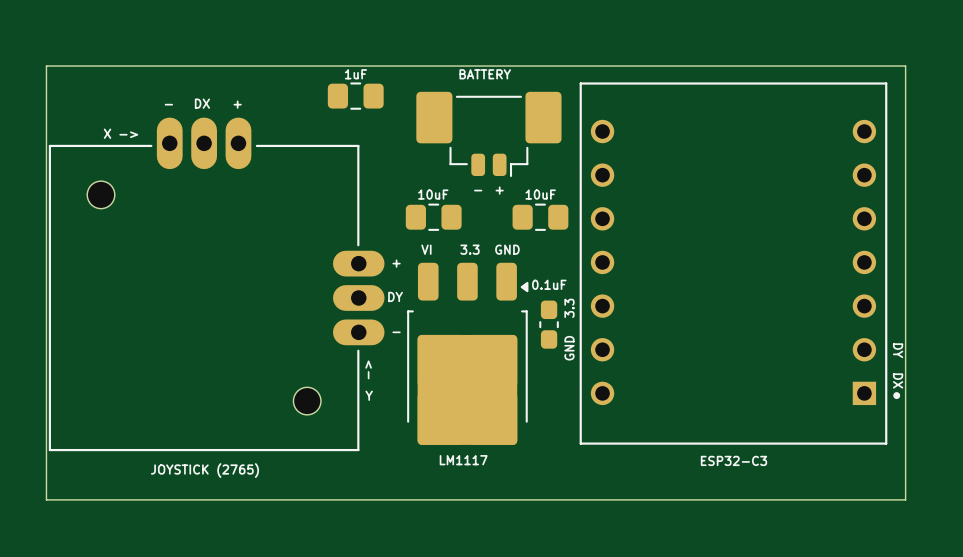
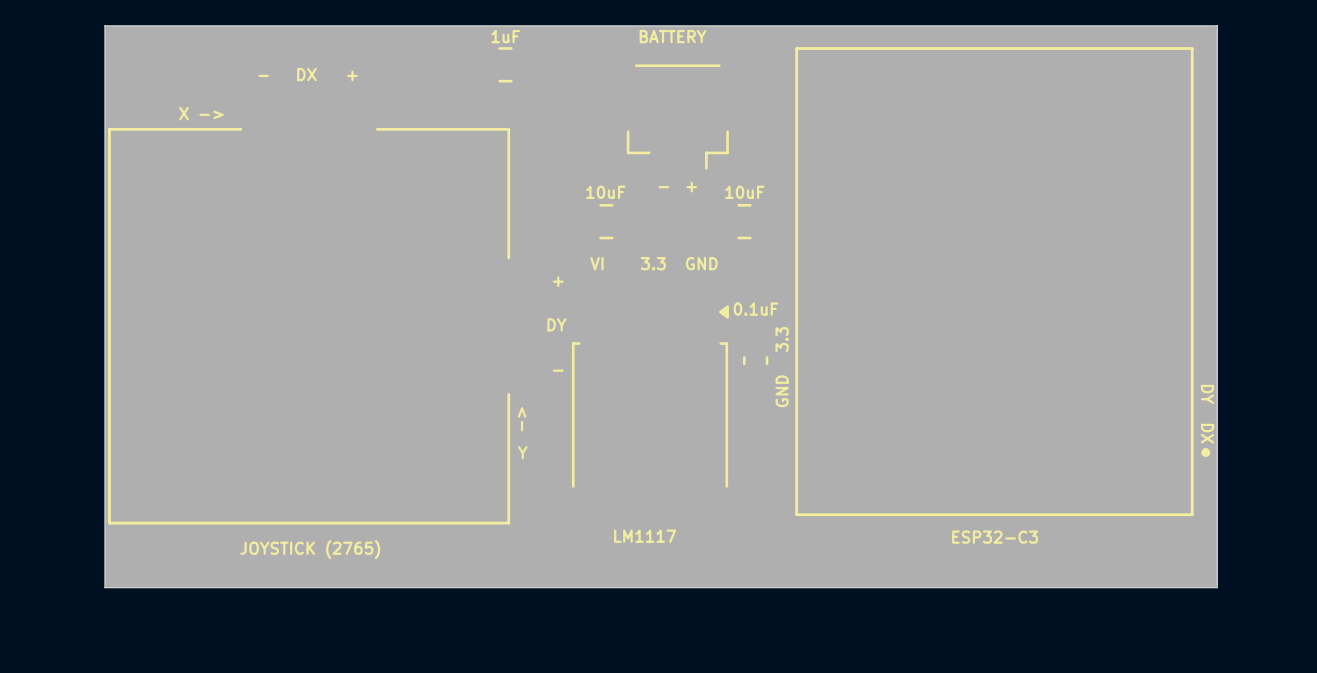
drawing: none -> [104, 25, 1218, 588]

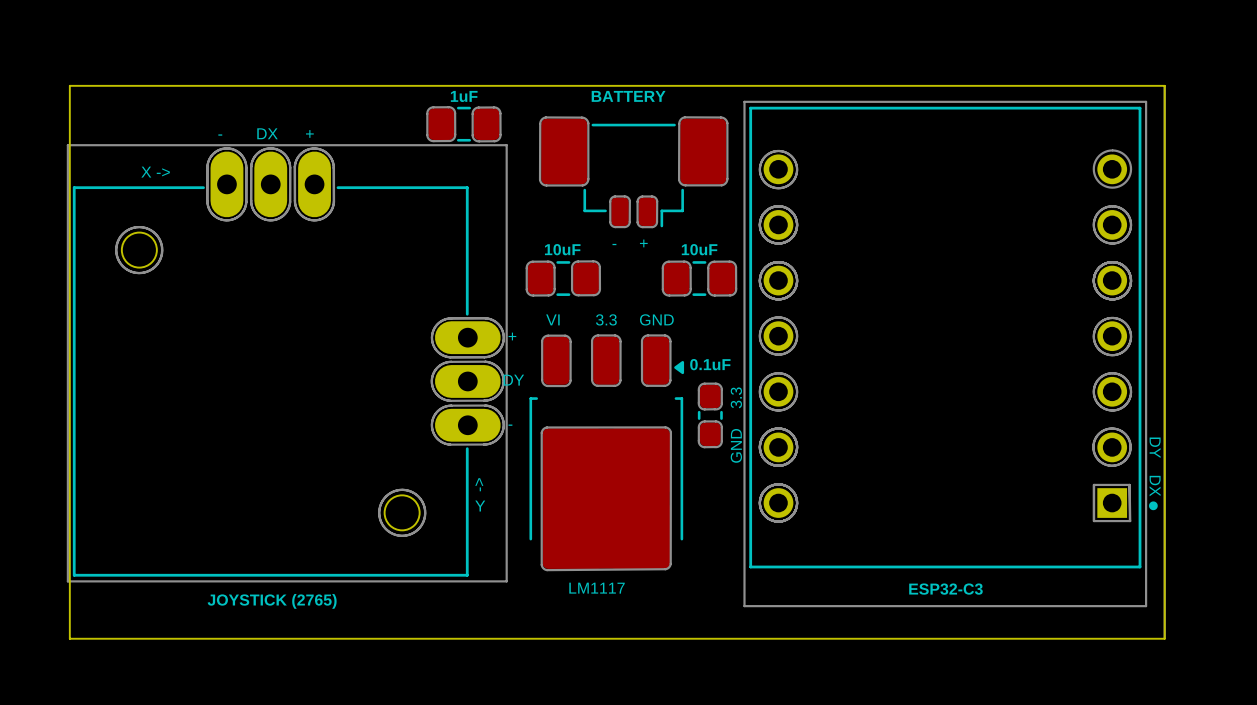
drawing: [104, 25, 1218, 588] -> none
line: none -> (744, 101) (1146, 101) (1146, 606) (744, 606) (744, 101)
line: none -> (67, 145) (506, 145) (506, 581) (67, 581) (67, 145)

